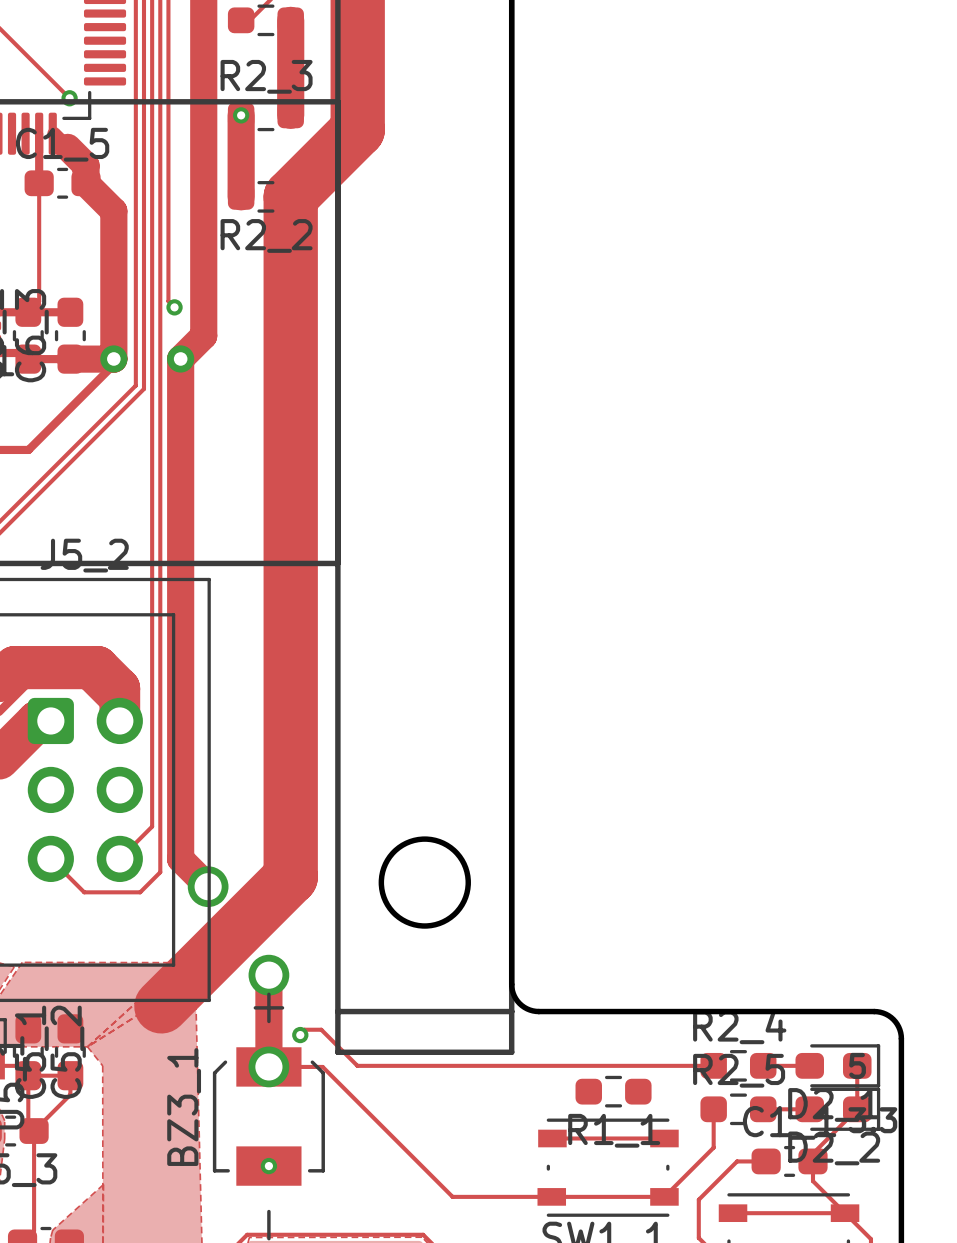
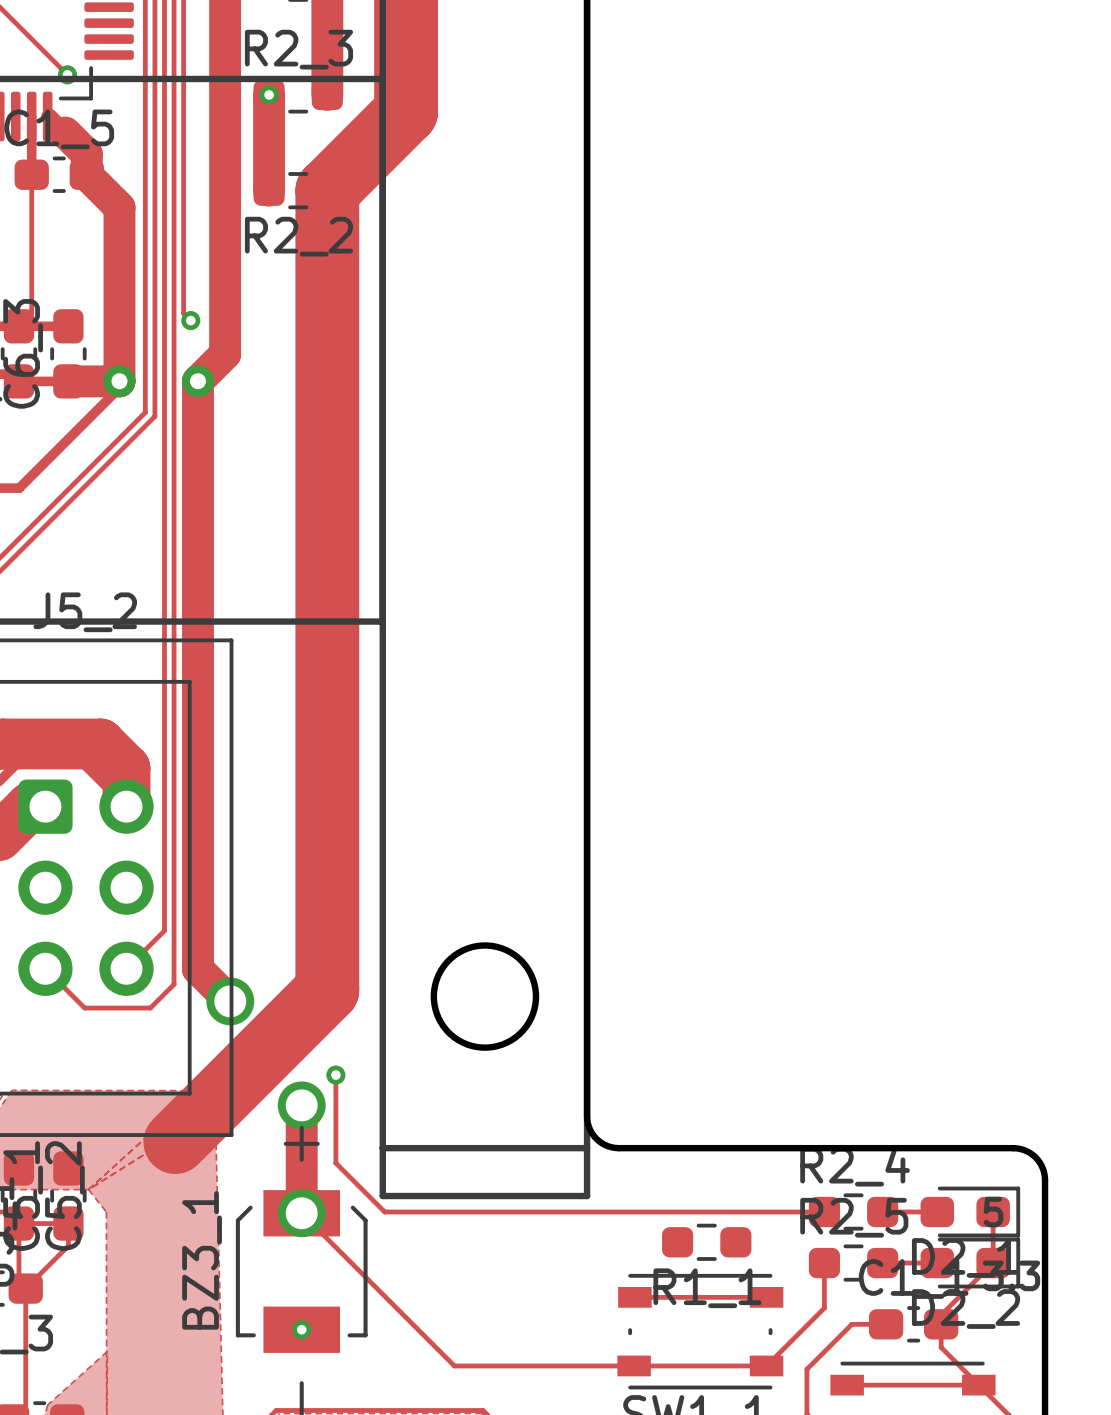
track: (300, 1035) (304, 1029) (321, 1029) (357, 1065) -> (335, 1075) (335, 1163) (384, 1211) (405, 1211)
via position: (300, 1035) -> (335, 1075)
track: (268, 1066) (322, 1066) (452, 1196) -> (301, 1213) (454, 1365) (517, 1365)

